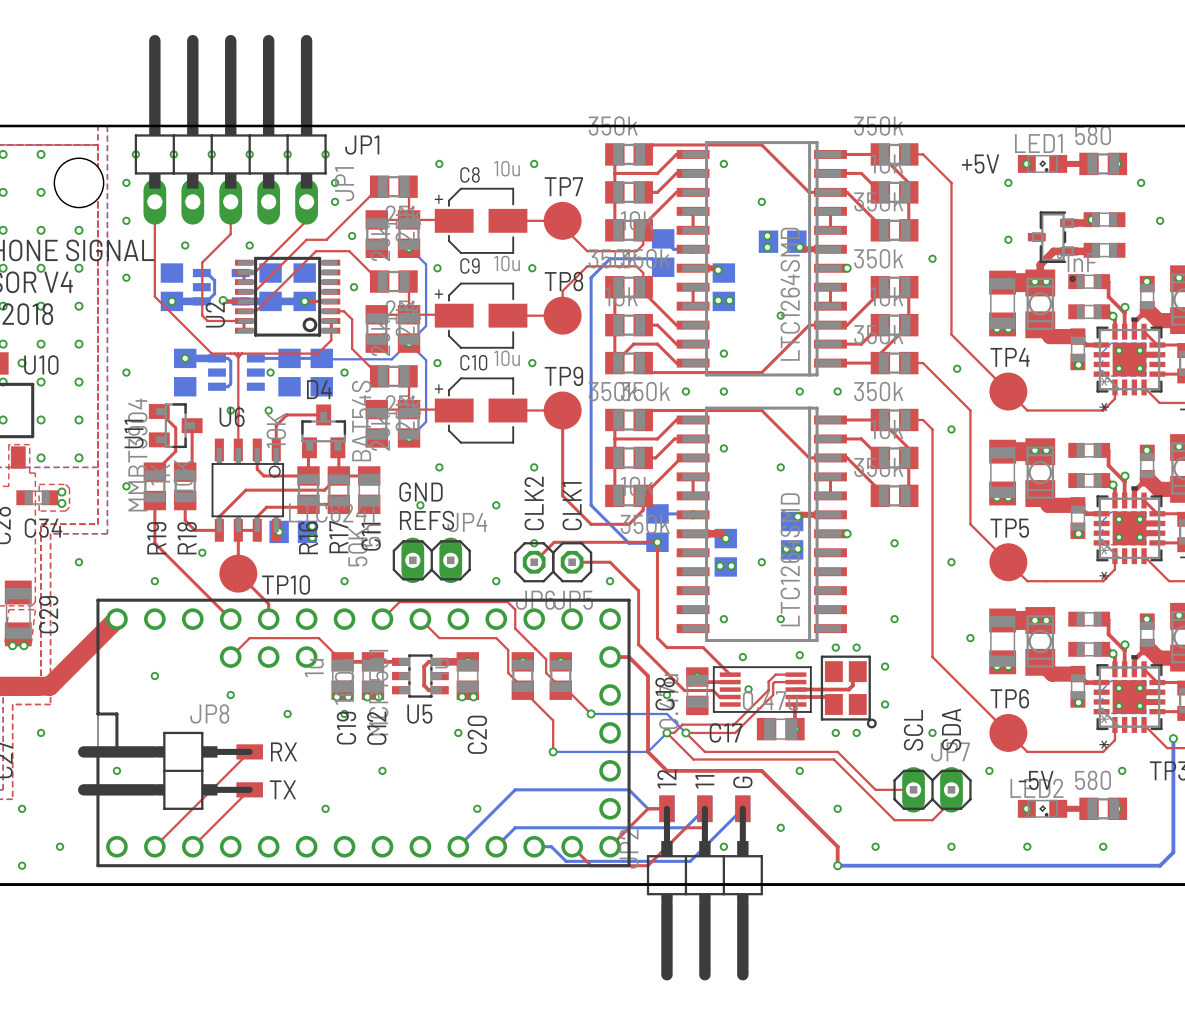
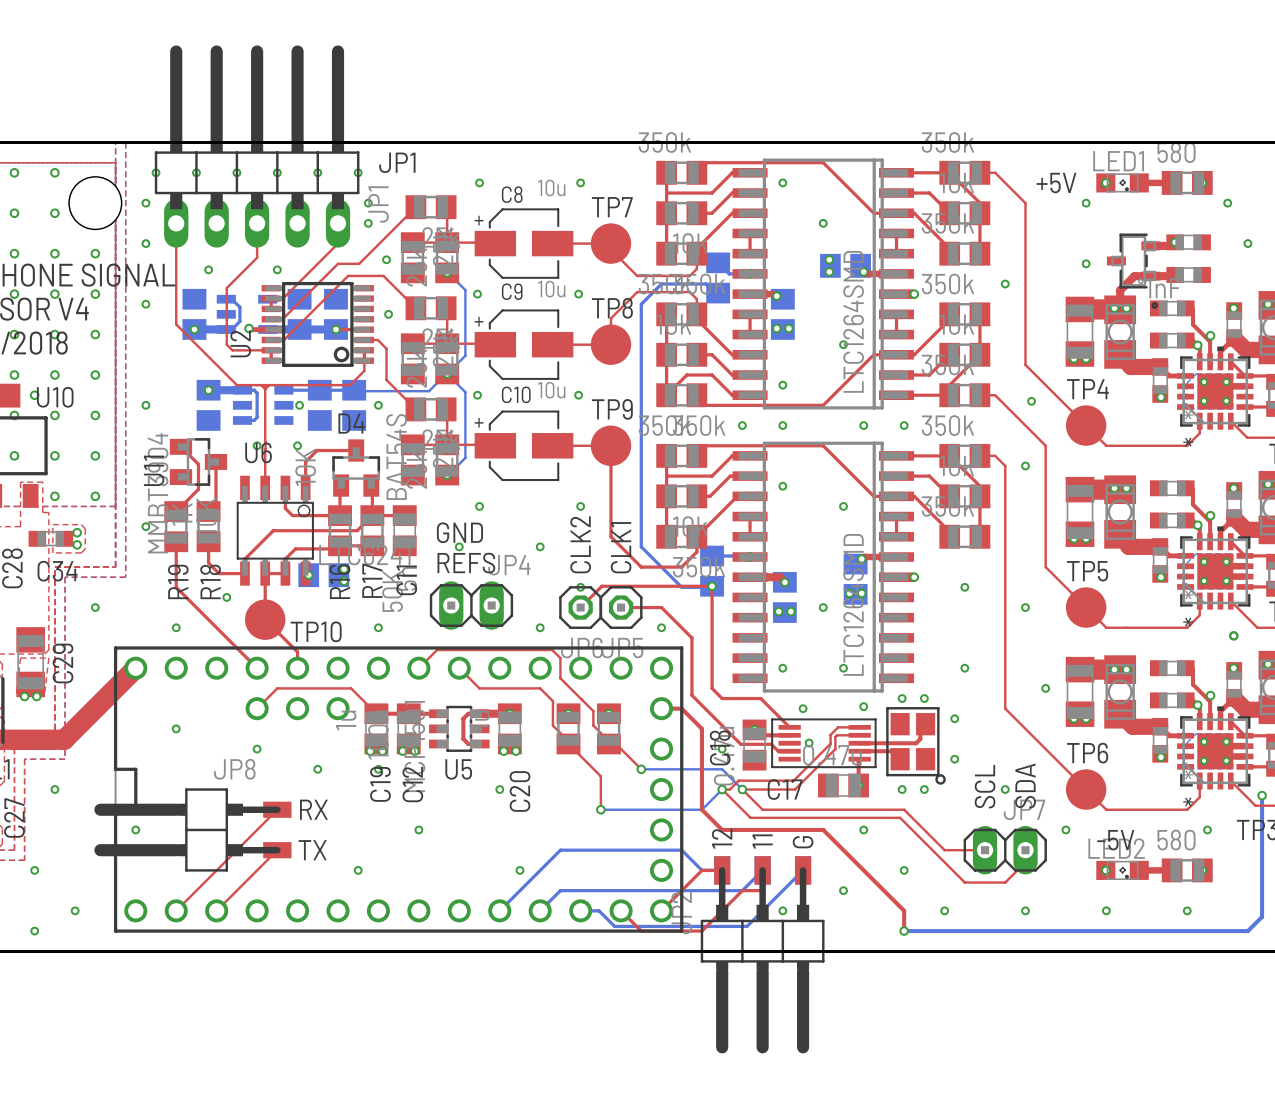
via: none -> (1233, 635)

